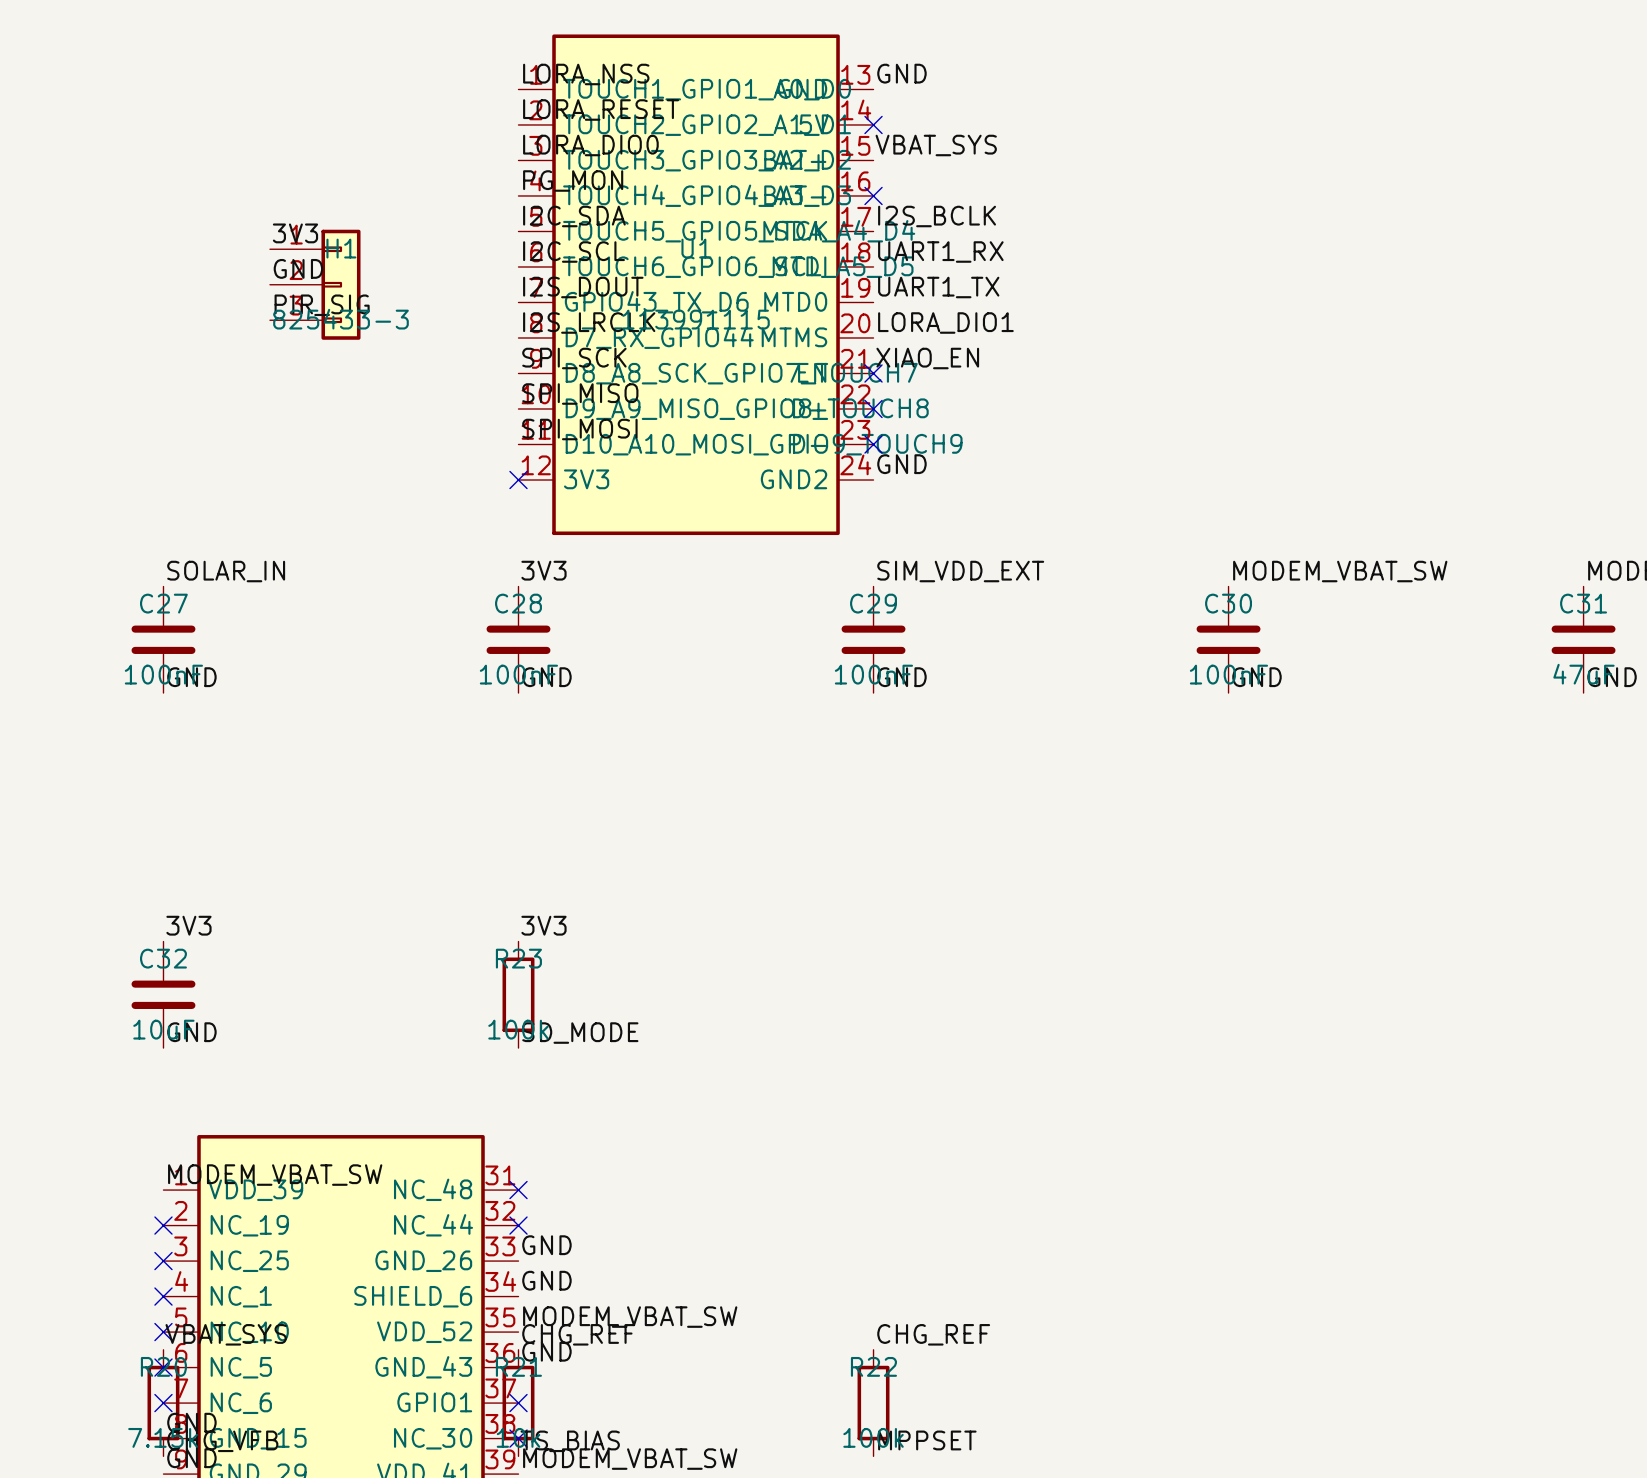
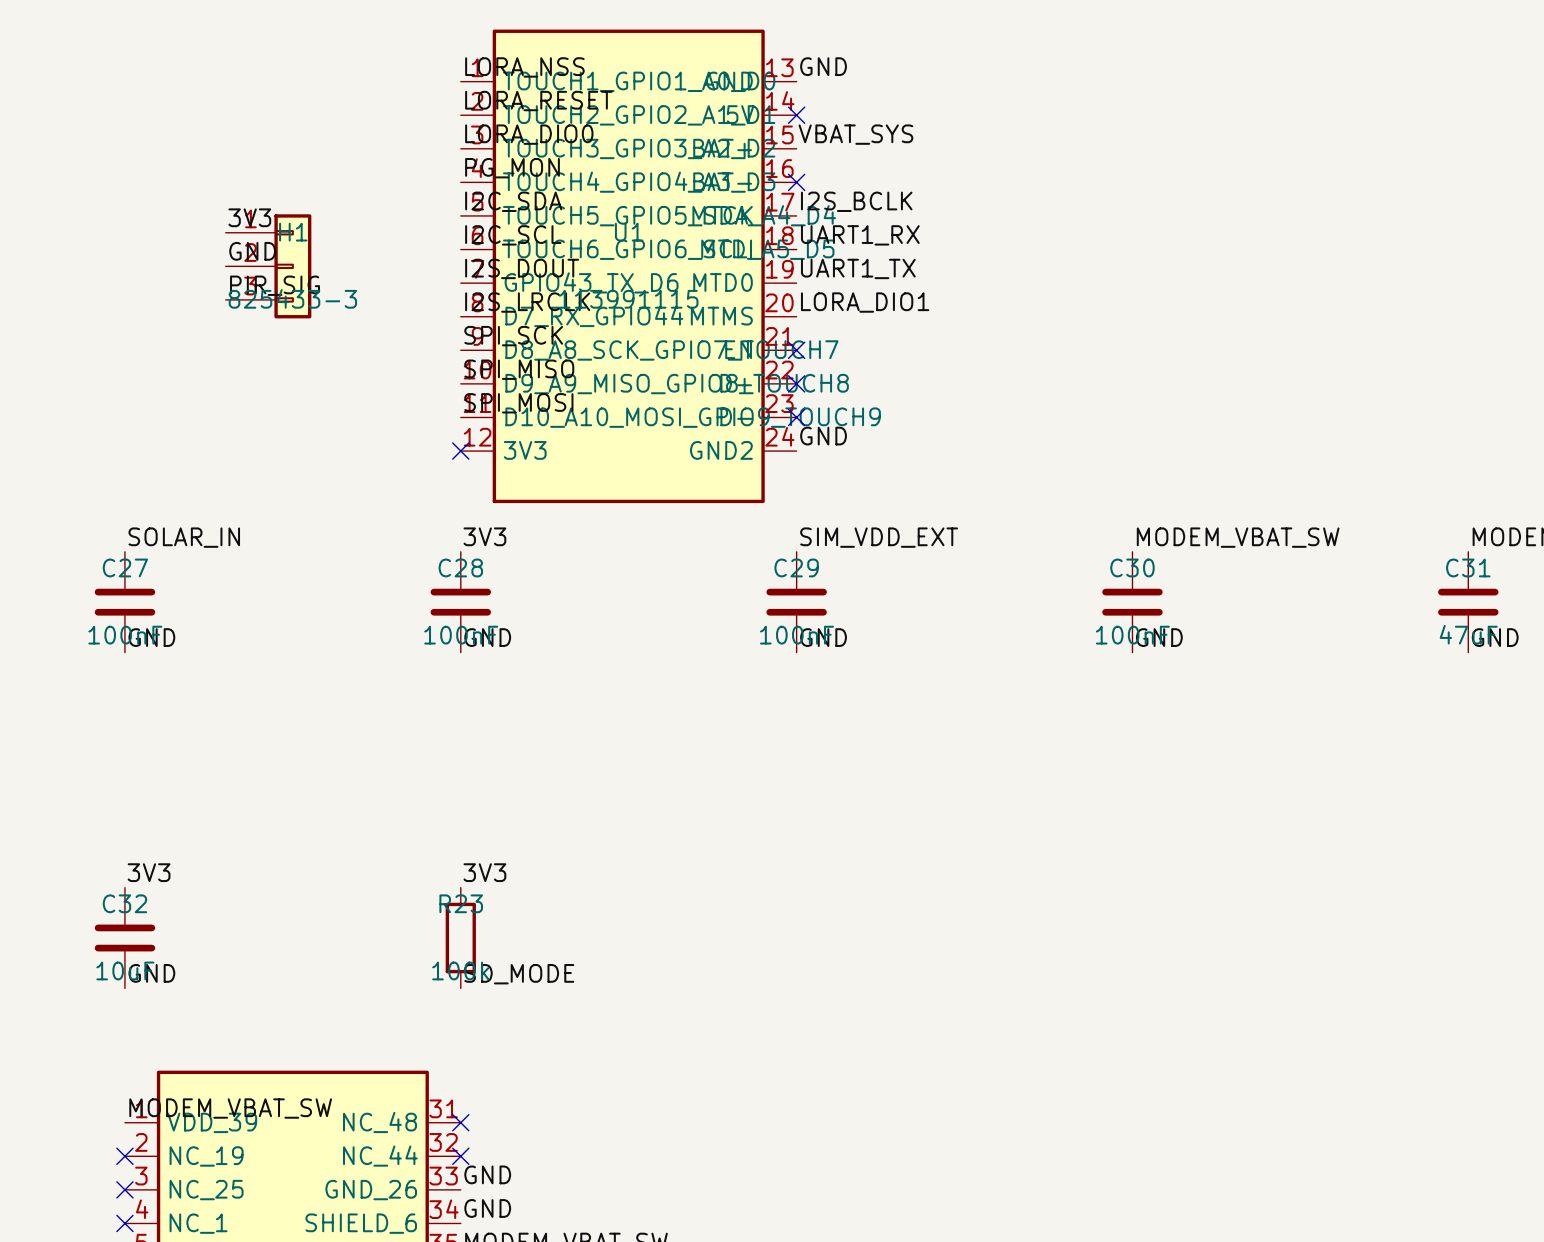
label: XIAO_EN (927, 358) -> none

